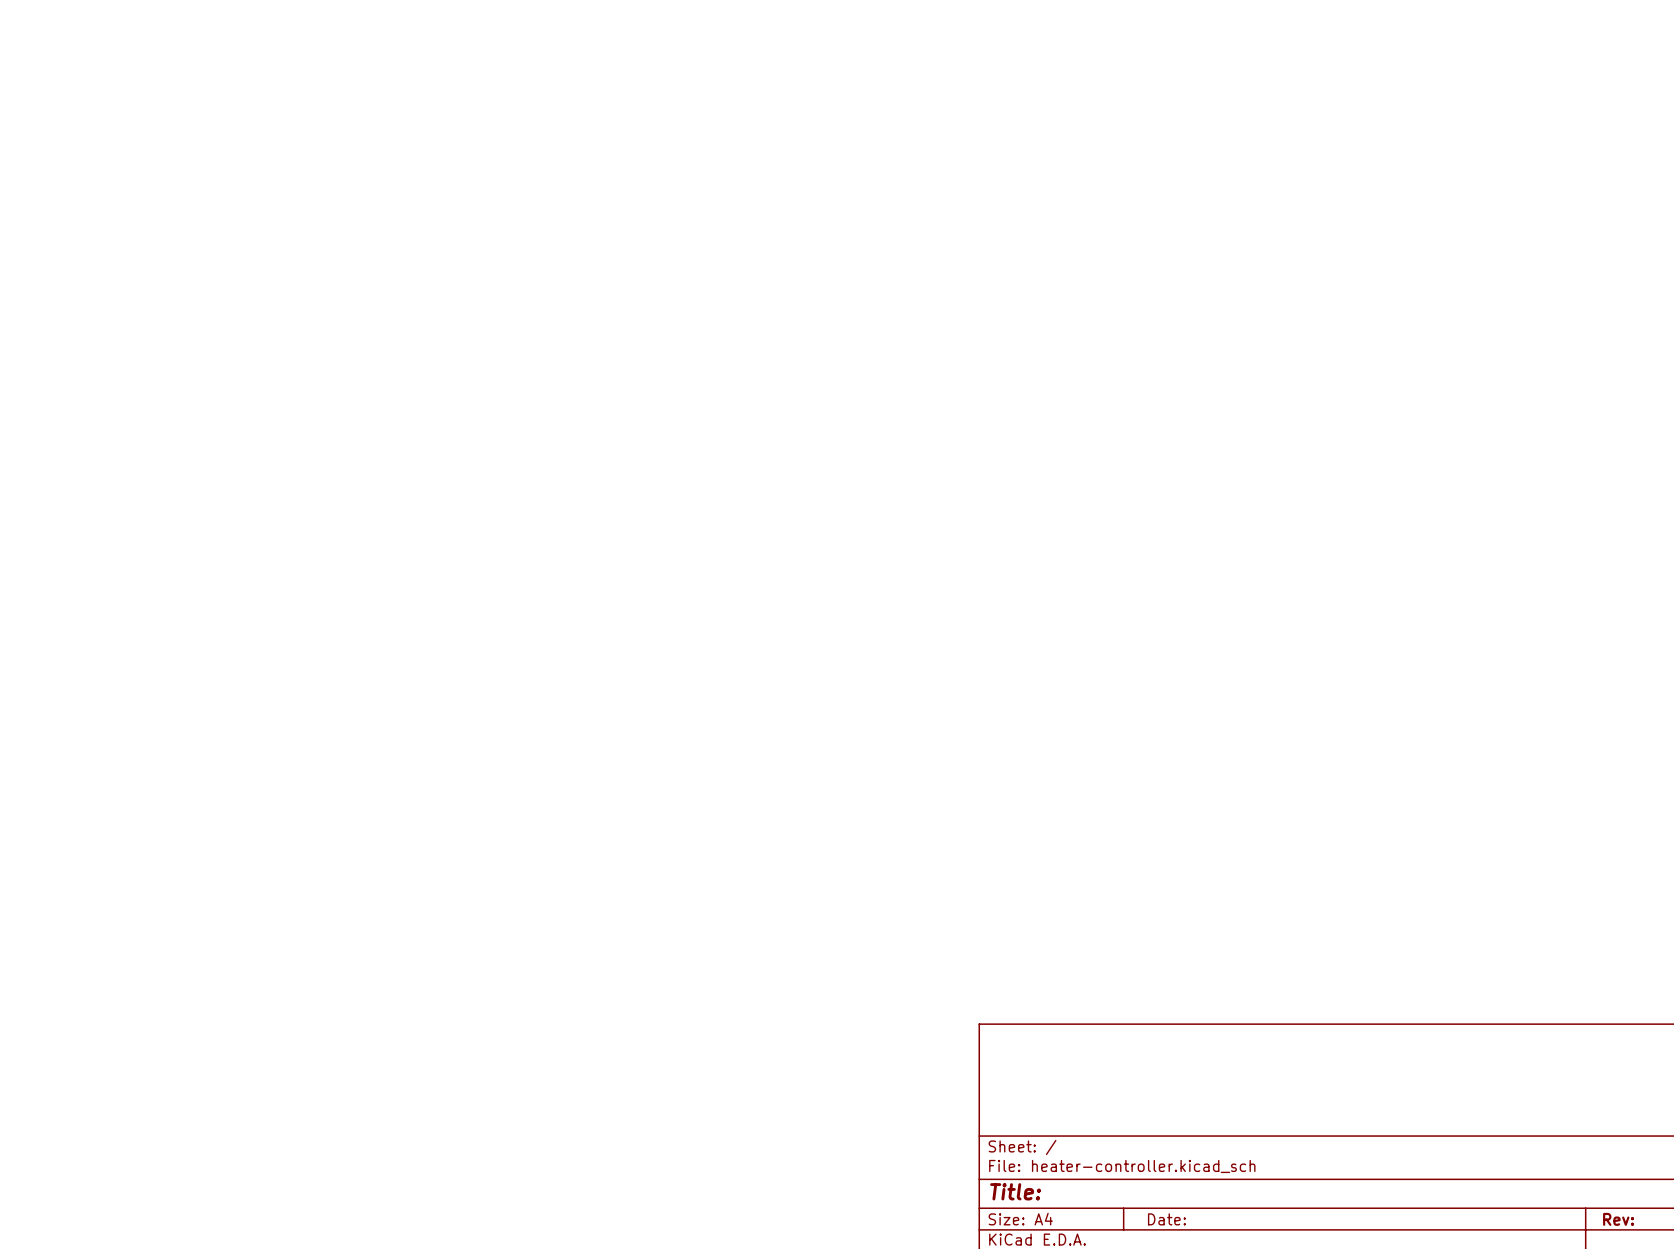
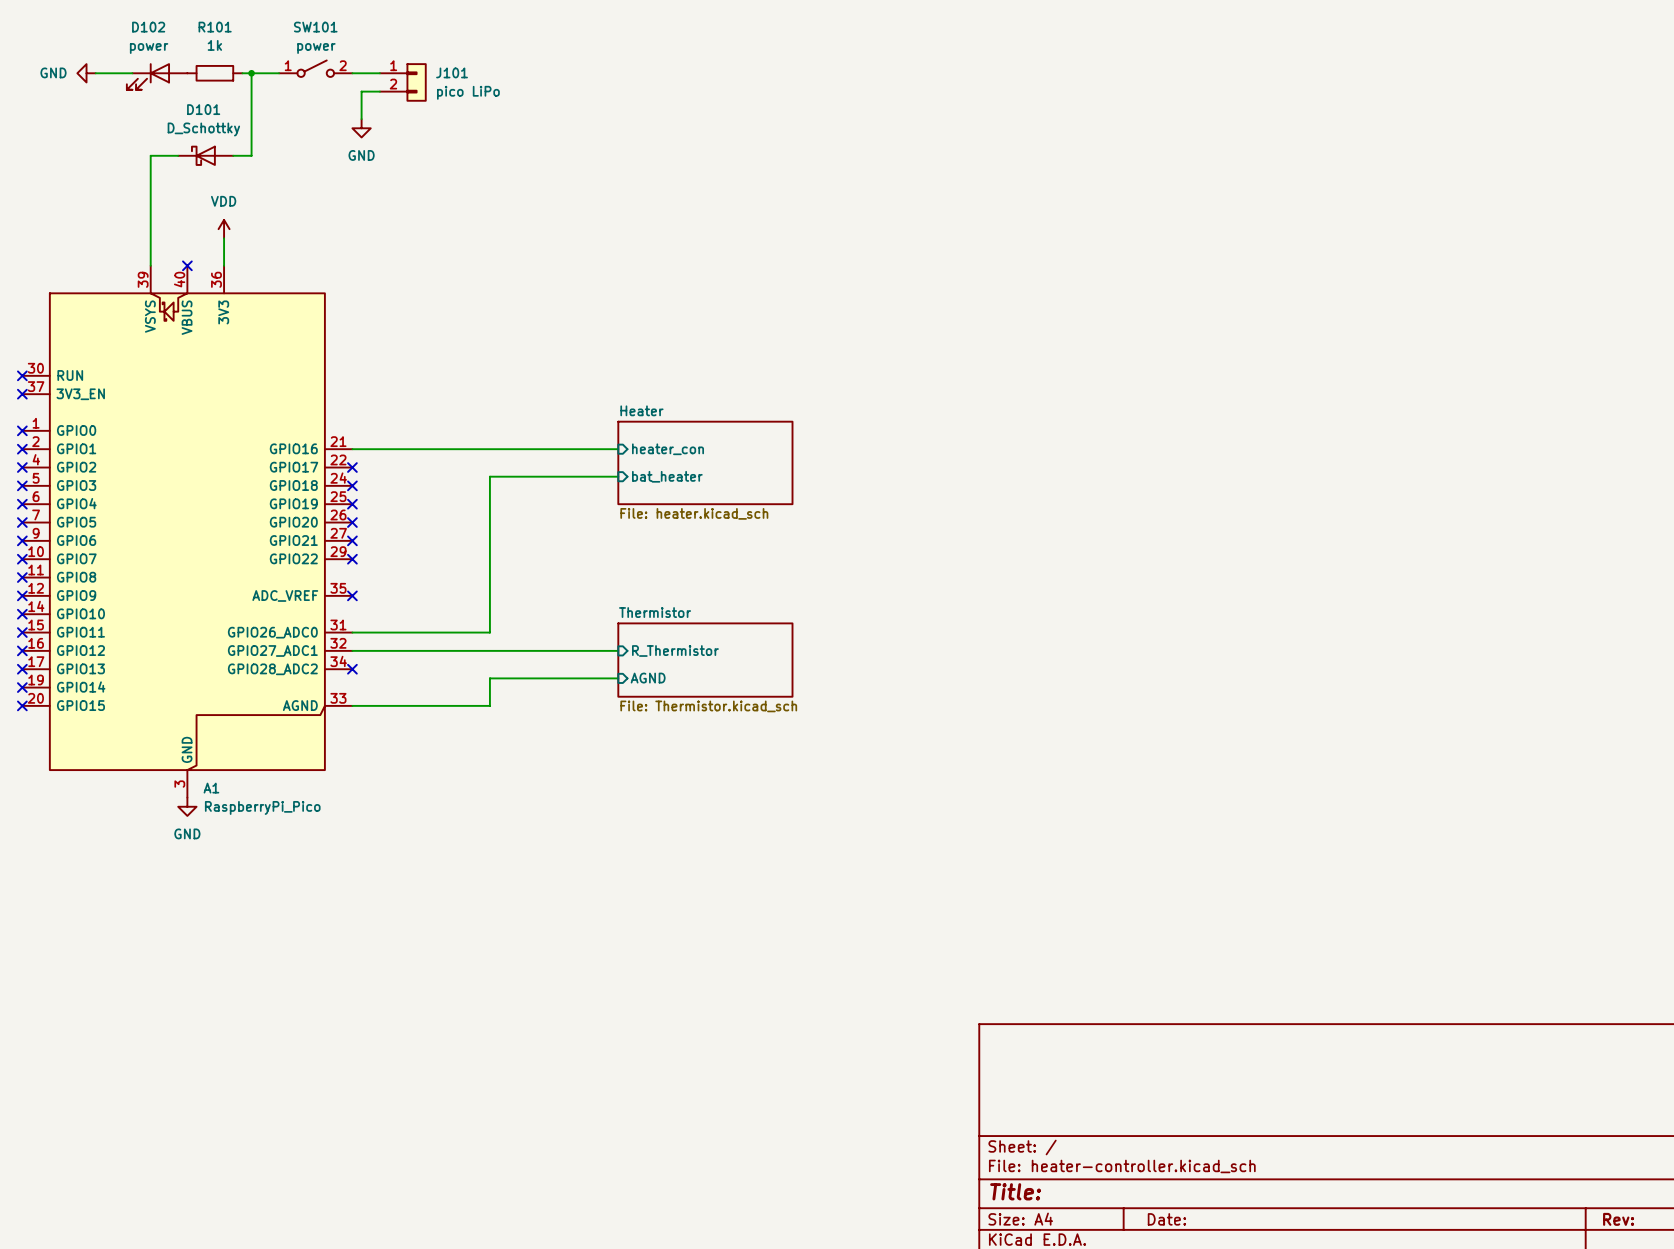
SW101: none -> power (315, 68)
power symbol: none -> GND (86, 73)
wire: none -> (95, 73) (132, 73)
R101: none -> 1k (214, 73)
wire: none -> (242, 73) (279, 73)
wire: none -> (251, 73) (251, 155) (233, 155)
junction: none -> (251, 73)
wire: none -> (352, 73) (379, 73)
D102: none -> power (157, 76)
J101: none -> pico LiPo (403, 82)
wire: none -> (379, 91) (361, 91) (361, 119)
power symbol: none -> GND (361, 128)
wire: none -> (178, 155) (150, 155) (150, 265)
D101: none -> D_Schottky (205, 155)
power symbol: none -> VDD (224, 229)
wire: none -> (224, 238) (224, 265)
no-connect mark: none -> (187, 265)
no-connect mark: none -> (22, 375)
no-connect mark: none -> (22, 394)
no-connect mark: none -> (22, 430)
no-connect mark: none -> (22, 449)
wire: none -> (352, 449) (618, 449)
sheet pin: none -> heater_con (668, 449)
sheet Heater: none -> File: heater.kicad_sch (705, 462)
no-connect mark: none -> (22, 467)
no-connect mark: none -> (352, 467)
wire: none -> (618, 476) (489, 476) (489, 632) (352, 632)
sheet pin: none -> bat_heater (667, 476)
no-connect mark: none -> (22, 485)
no-connect mark: none -> (352, 485)
no-connect mark: none -> (22, 504)
no-connect mark: none -> (352, 504)
no-connect mark: none -> (22, 522)
no-connect mark: none -> (352, 522)
A1: none -> RaspberryPi_Pico (187, 531)
no-connect mark: none -> (22, 540)
no-connect mark: none -> (352, 540)
no-connect mark: none -> (22, 559)
no-connect mark: none -> (352, 559)
no-connect mark: none -> (22, 577)
no-connect mark: none -> (22, 595)
no-connect mark: none -> (352, 595)
no-connect mark: none -> (22, 614)
no-connect mark: none -> (22, 632)
no-connect mark: none -> (22, 650)
wire: none -> (352, 650) (618, 650)
sheet pin: none -> R_Thermistor (675, 650)
sheet Thermistor: none -> File: Thermistor.kicad_sch (705, 660)
no-connect mark: none -> (22, 669)
no-connect mark: none -> (352, 669)
wire: none -> (618, 678) (489, 678) (489, 705) (352, 705)
sheet pin: none -> AGND (648, 678)
no-connect mark: none -> (22, 687)
no-connect mark: none -> (22, 705)
power symbol: none -> GND (187, 806)

